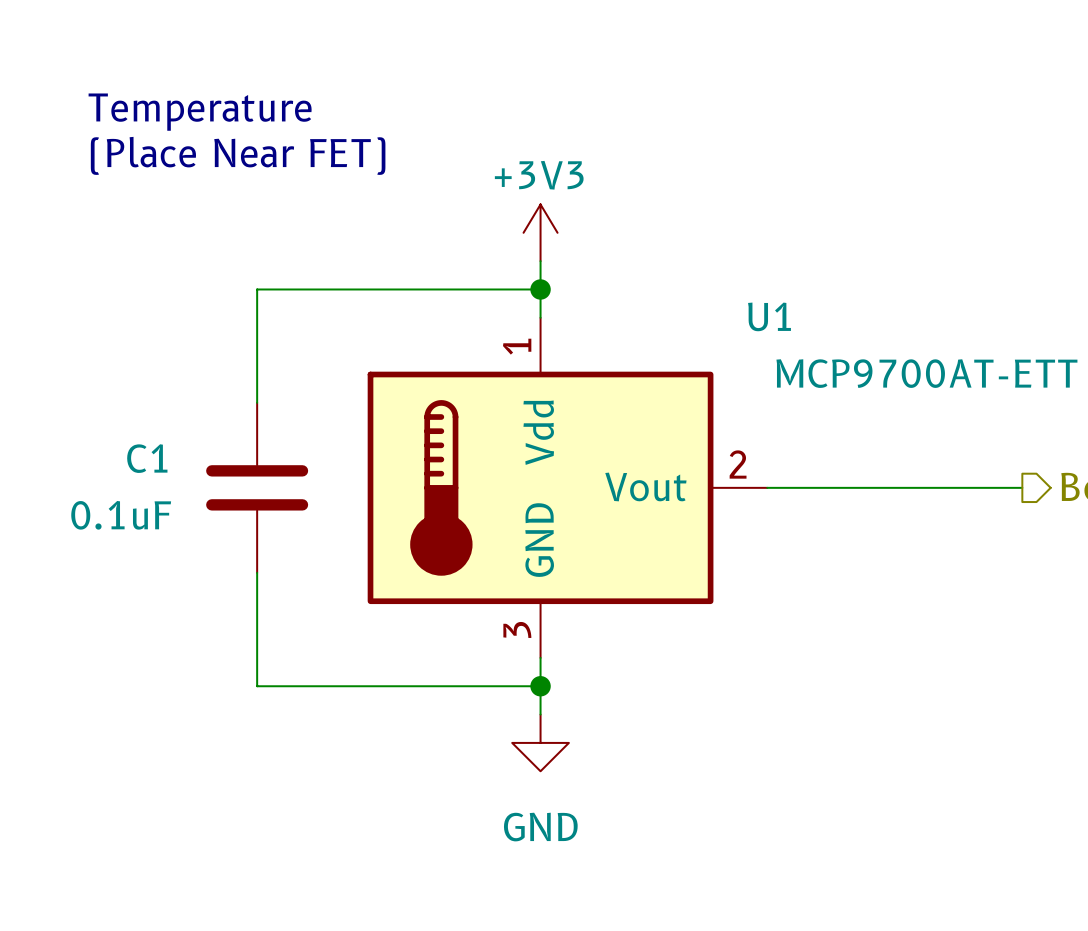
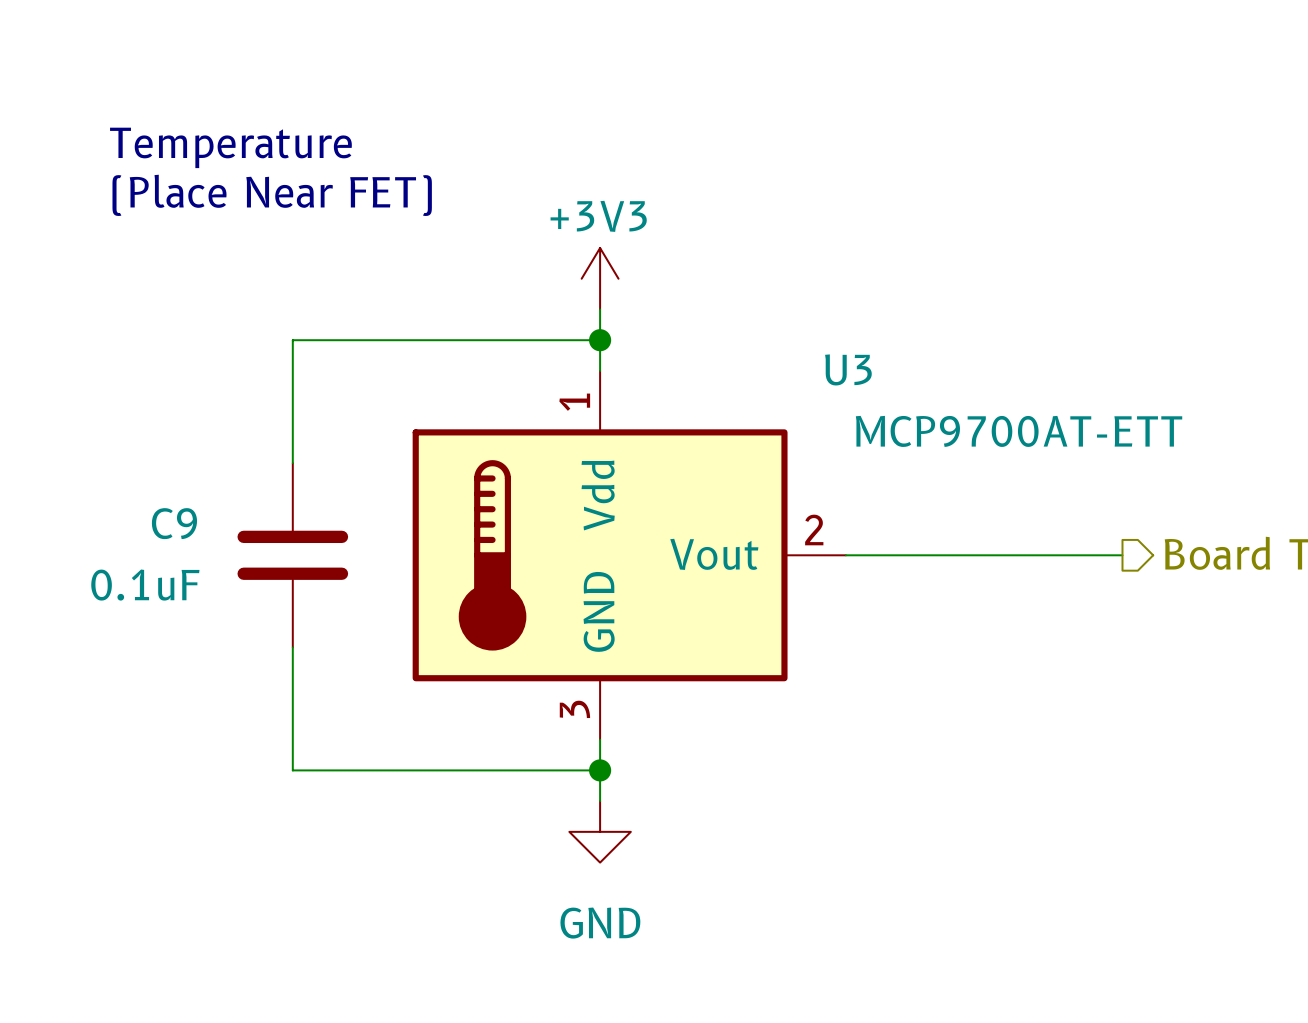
U1 name: U1 (769, 316) -> U3 (848, 369)
C1 name: C1 (147, 458) -> C9 (174, 523)

